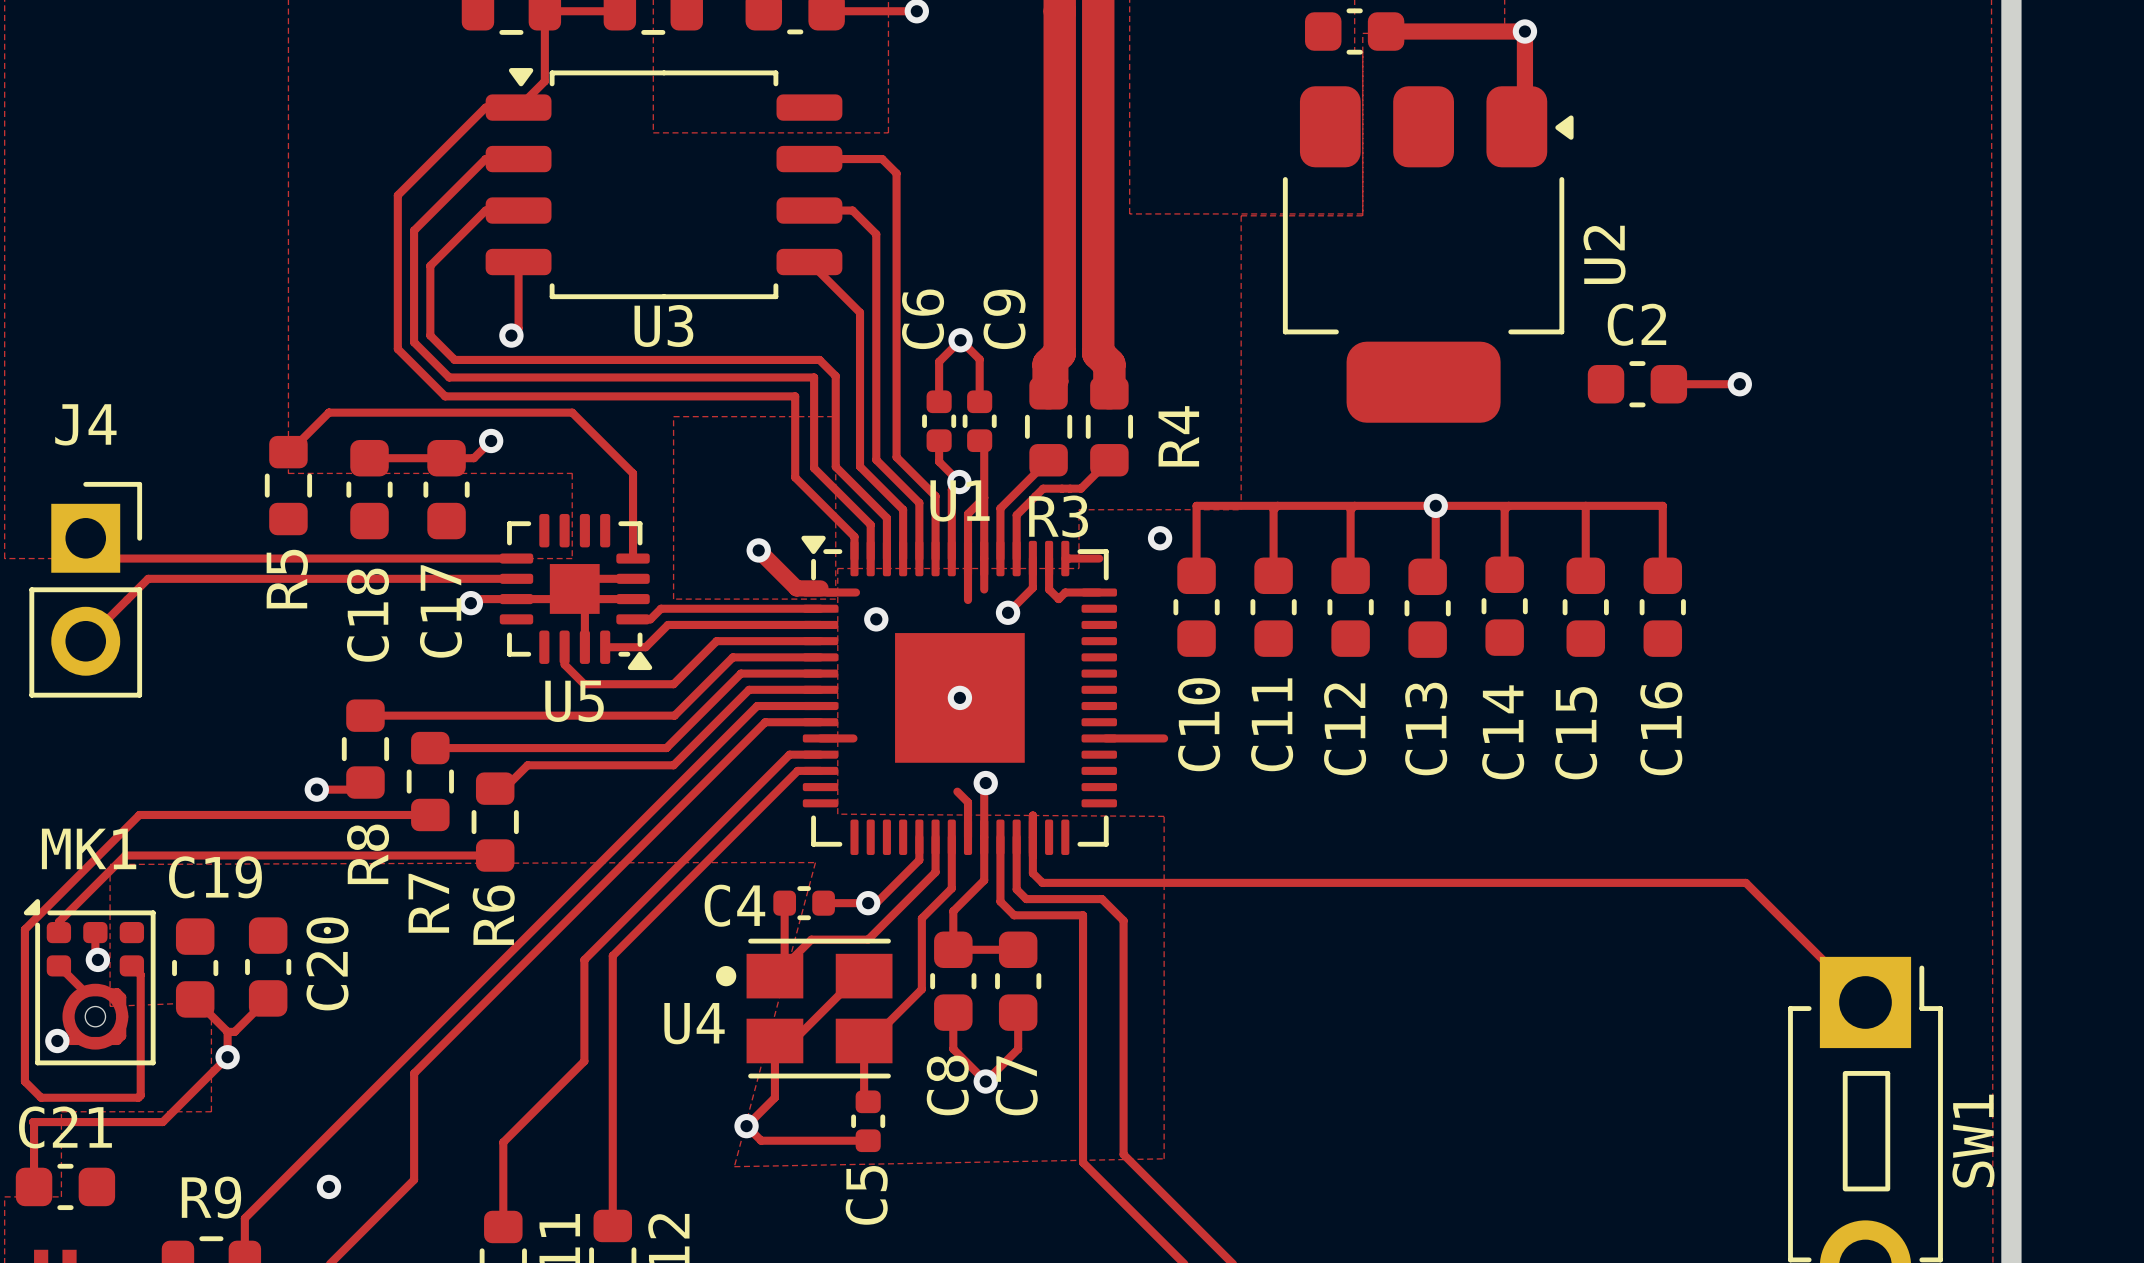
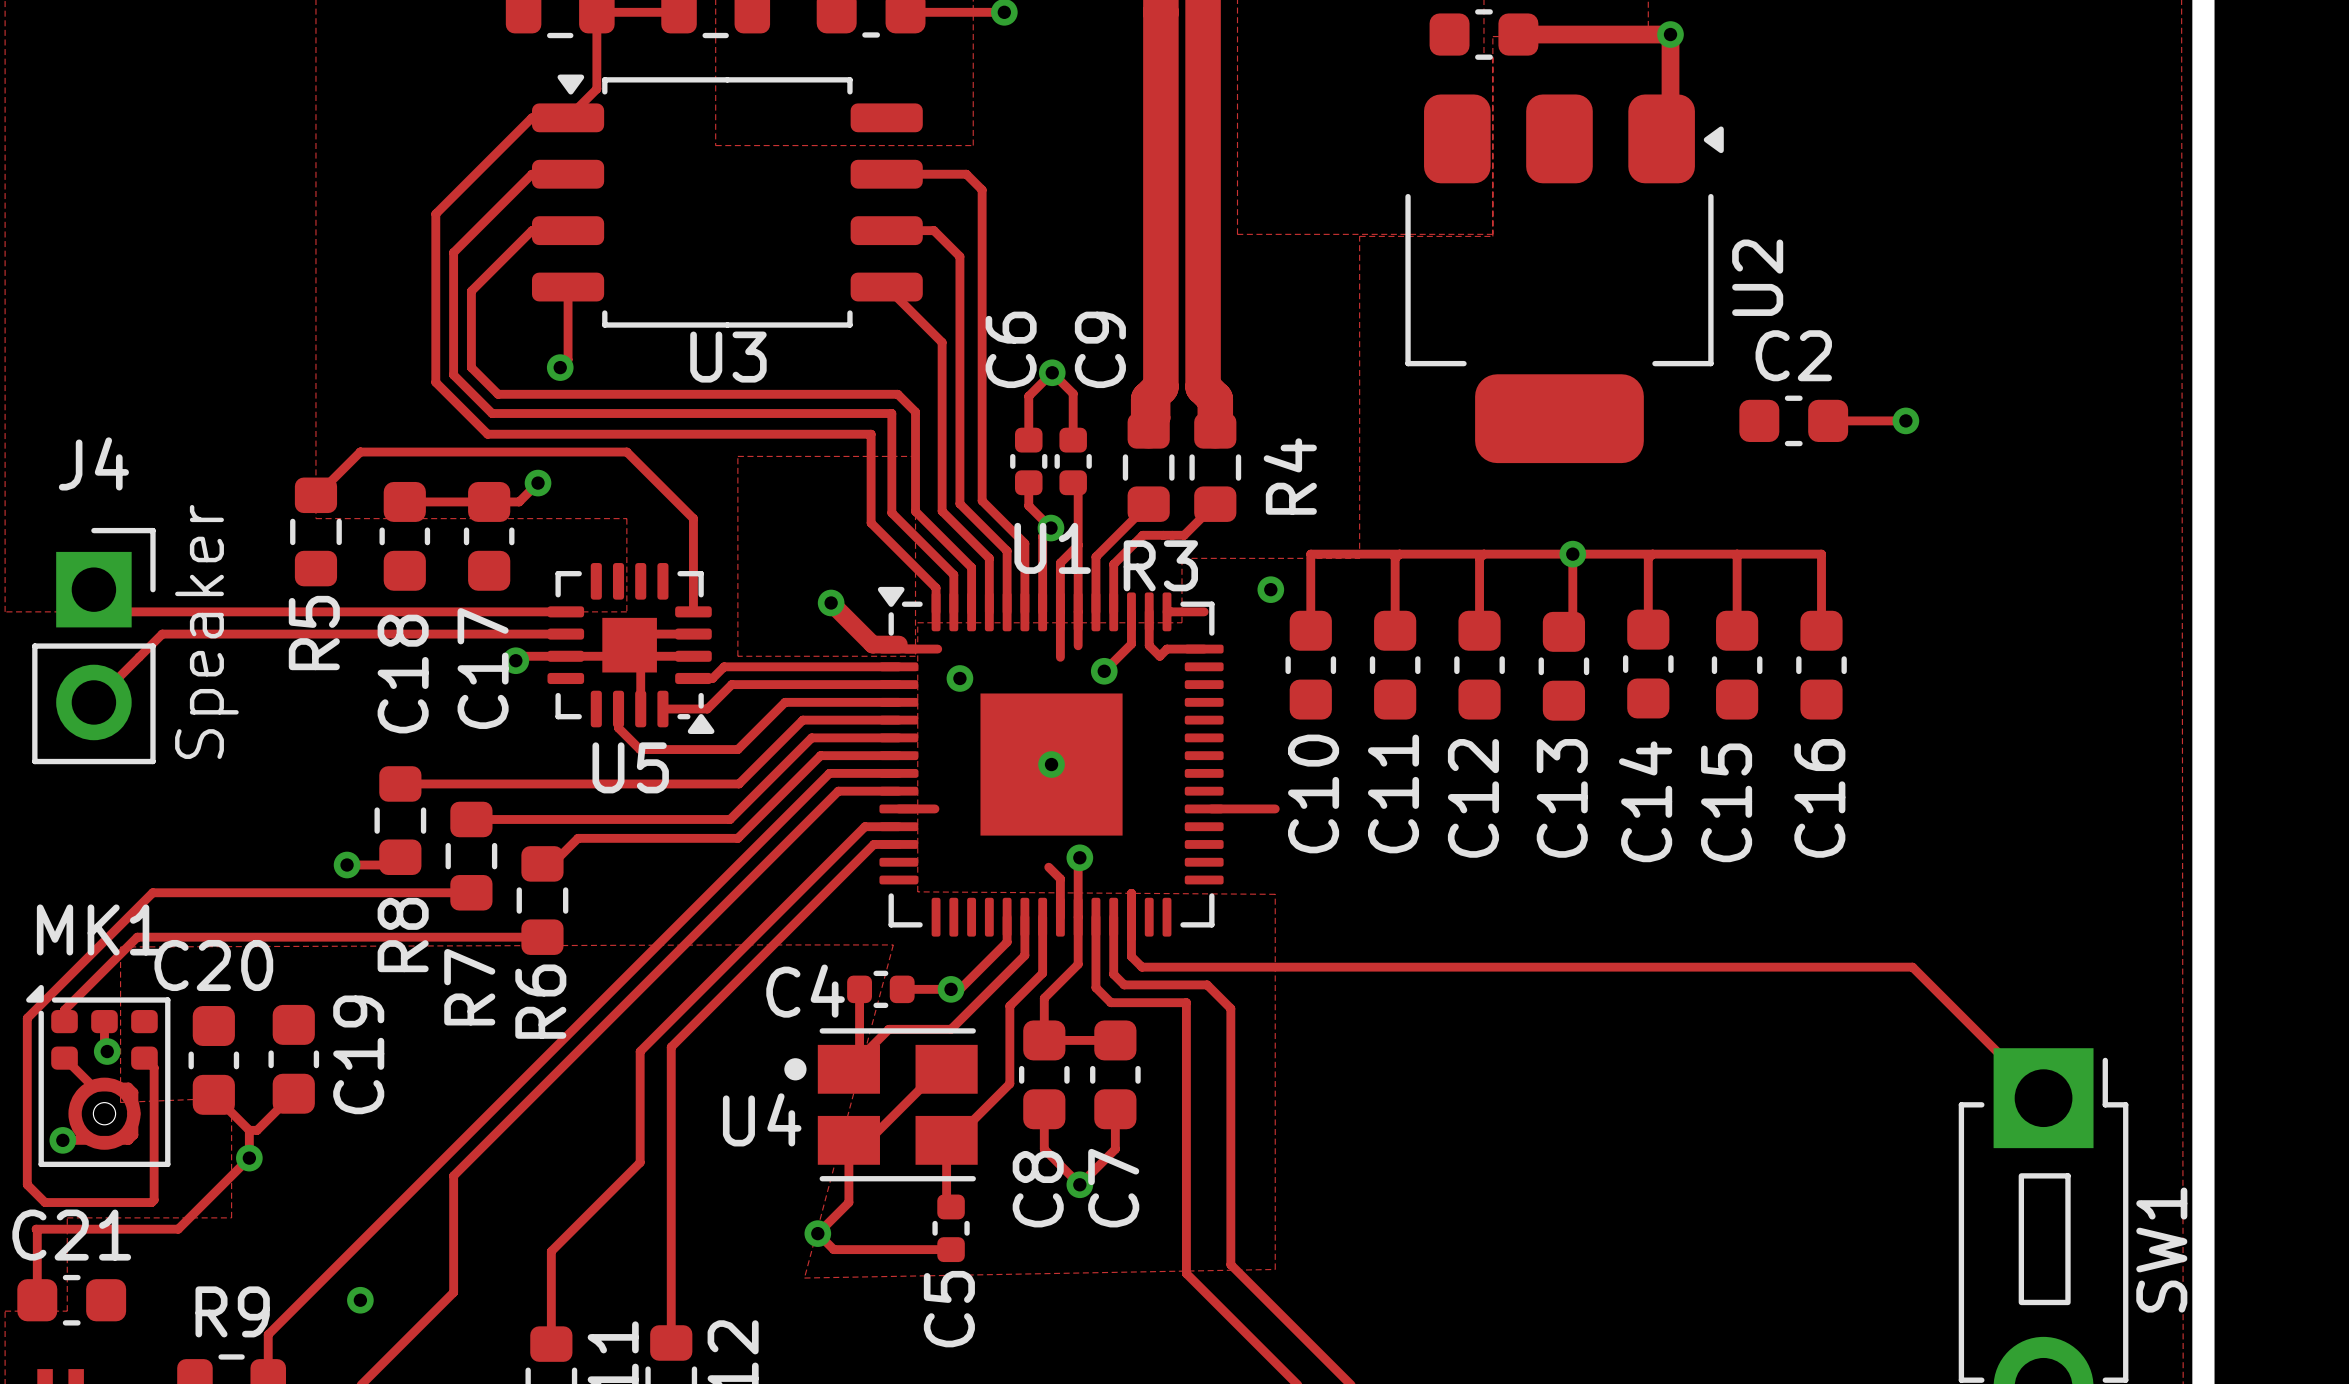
text: none -> Speaker (206, 631)
C19 name: C19 (215, 877) -> C20 (213, 965)
C20 name: C20 (327, 963) -> C19 (358, 1054)

